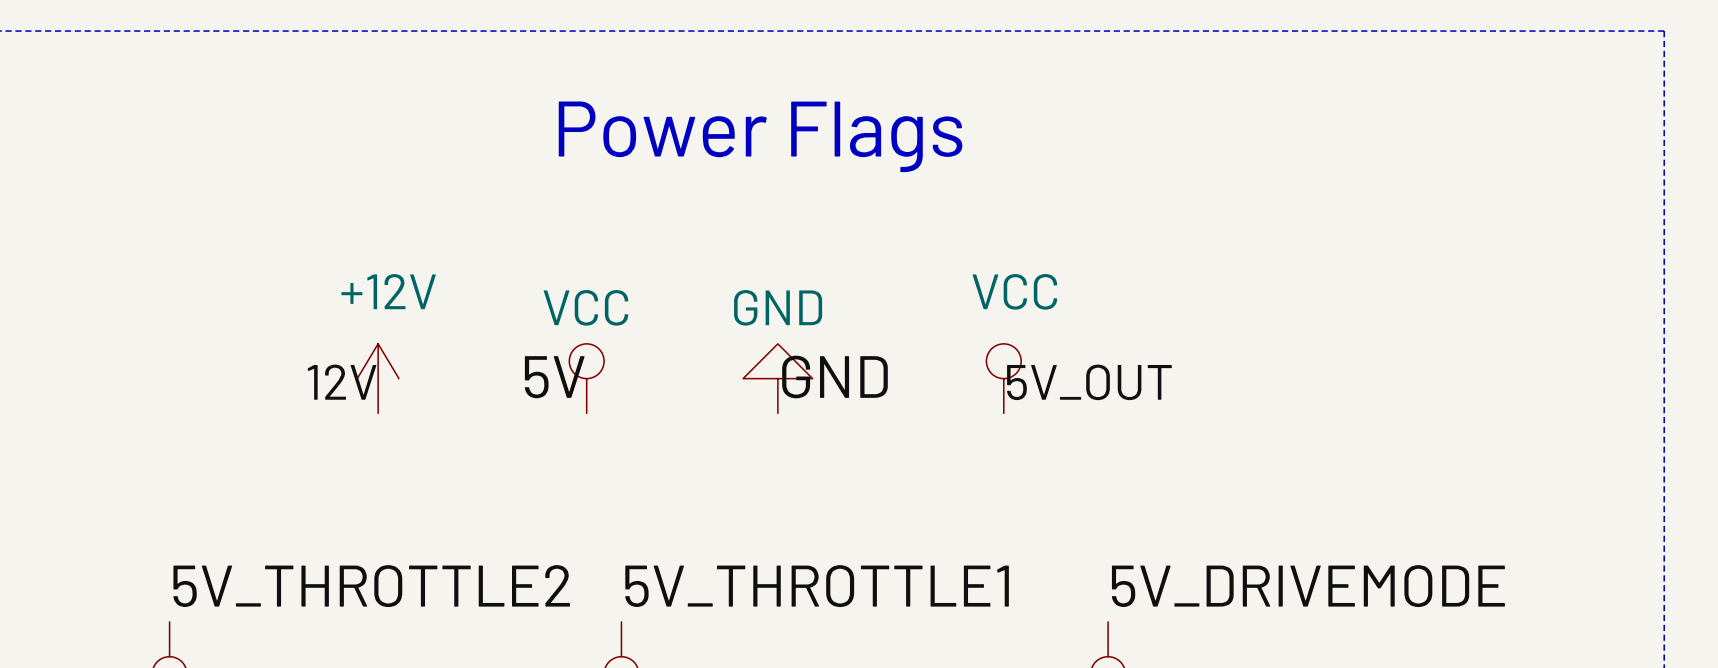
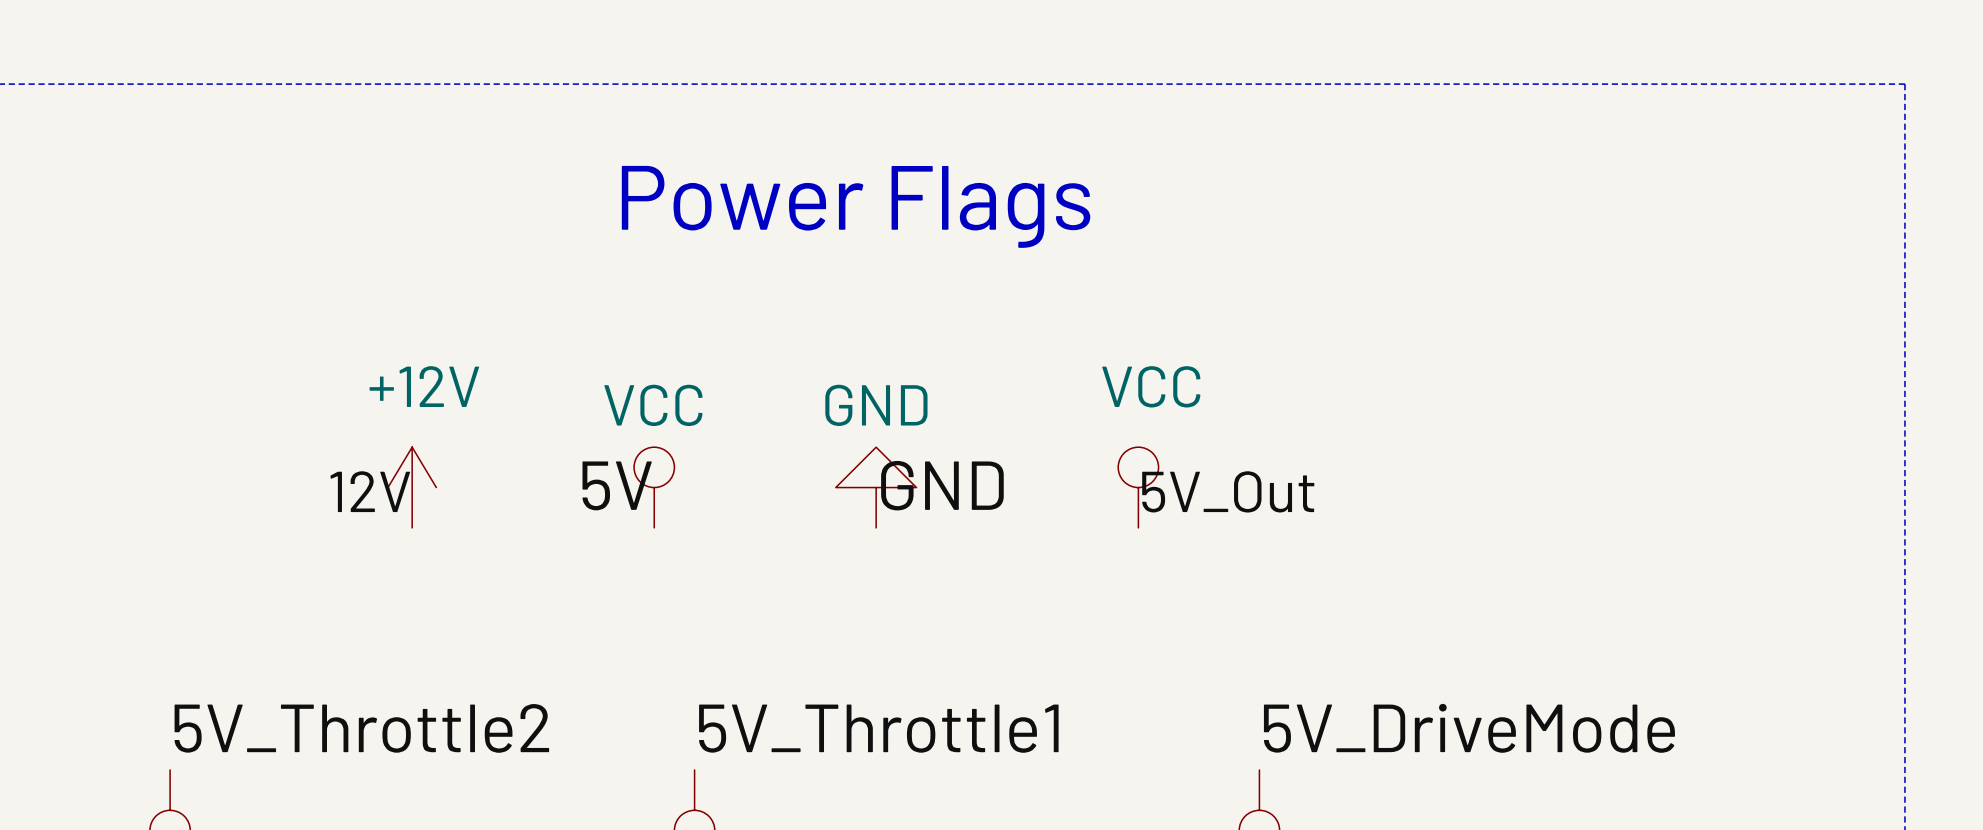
label: 5V_OUT (1089, 382) -> 5V_Out (1228, 491)
label: 5V_THROTTLE2 (371, 586) -> 5V_Throttle2 (361, 728)
label: 5V_THROTTLE1 (817, 586) -> 5V_Throttle1 (878, 728)
label: 5V_DRIVEMODE (1308, 586) -> 5V_DriveMode (1469, 728)

